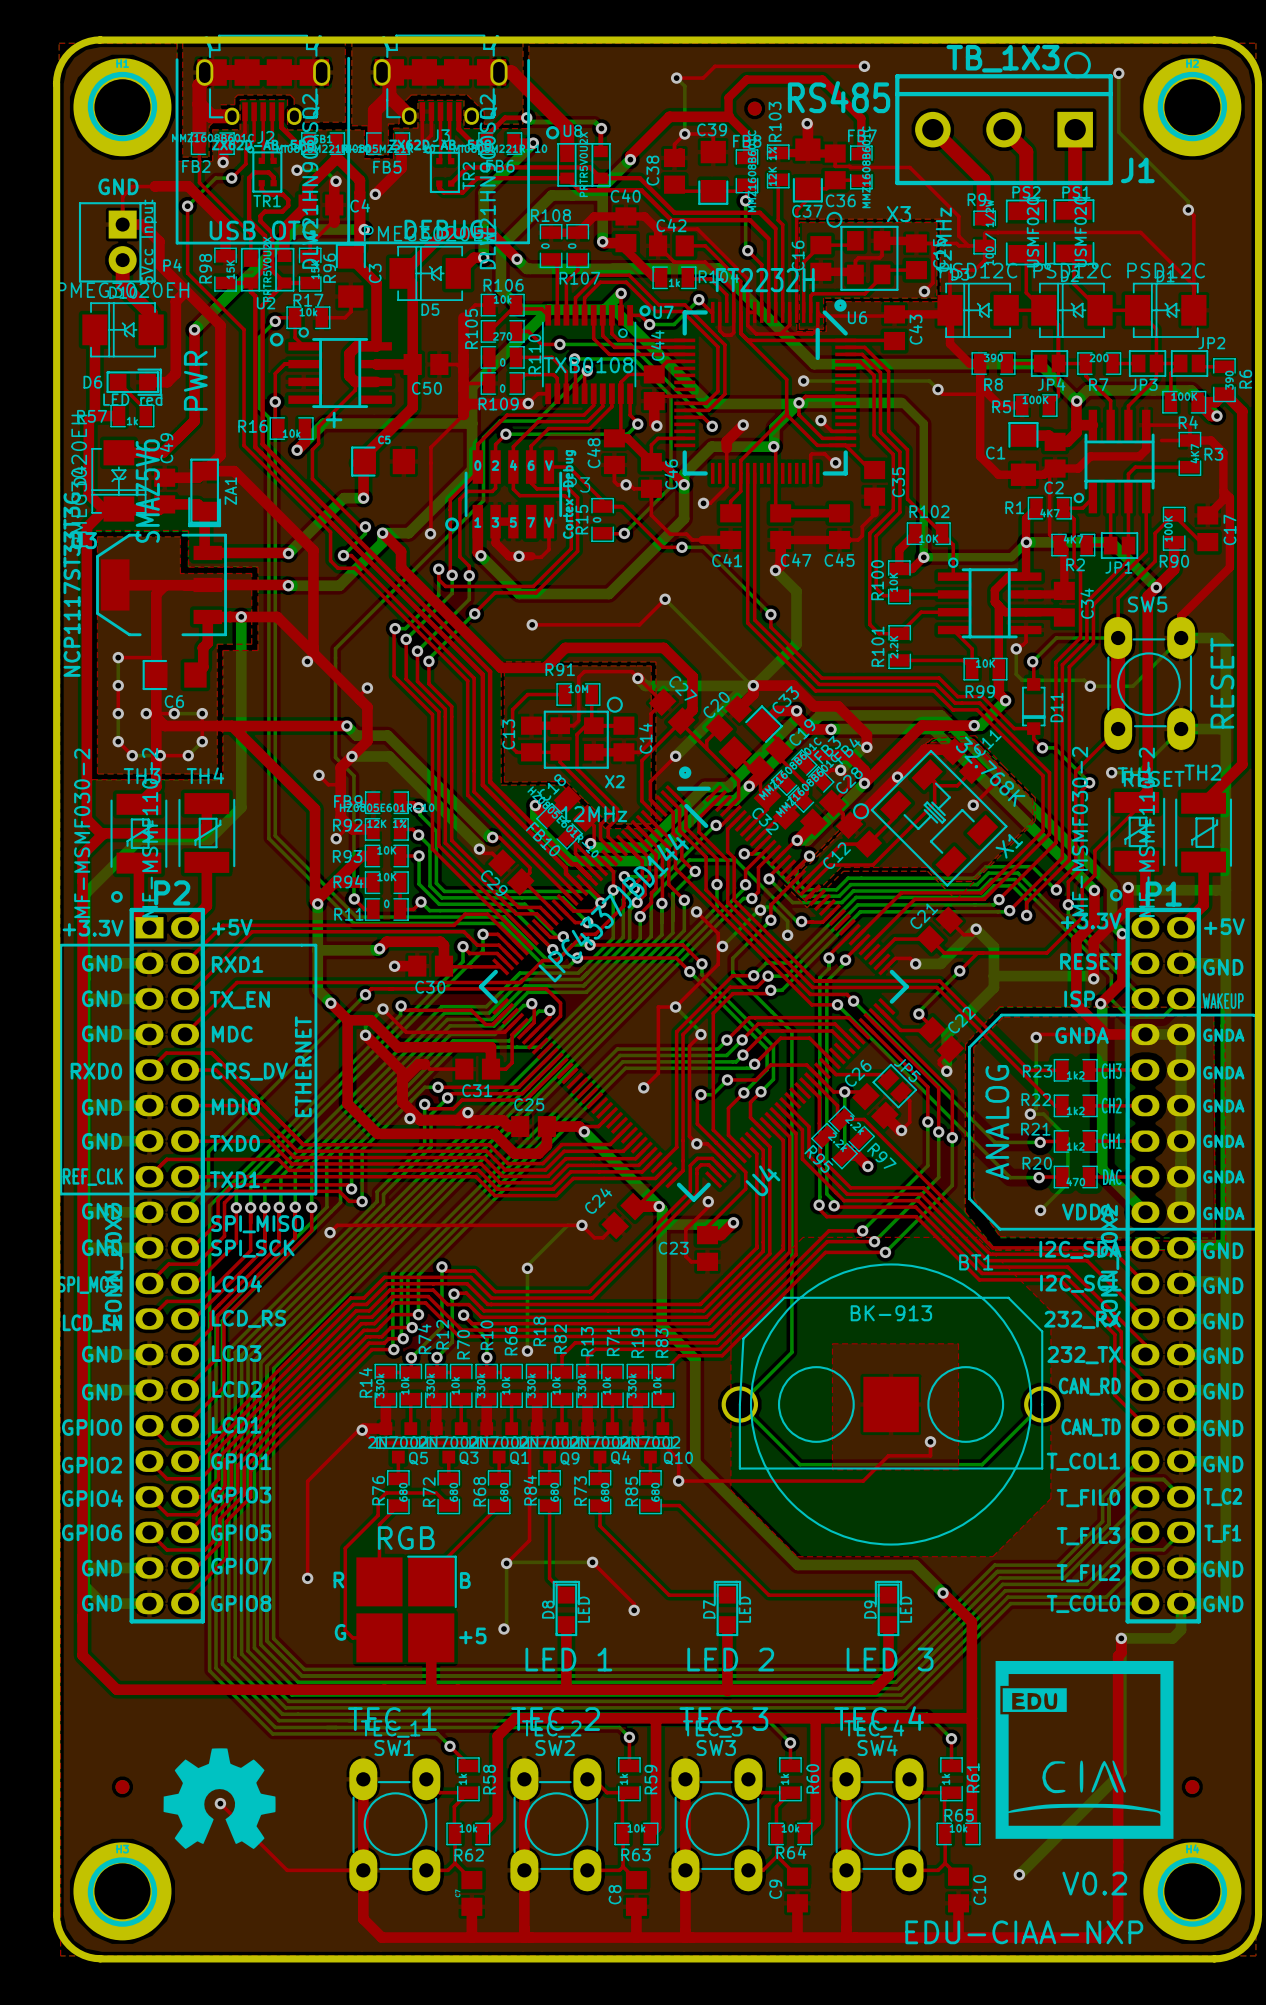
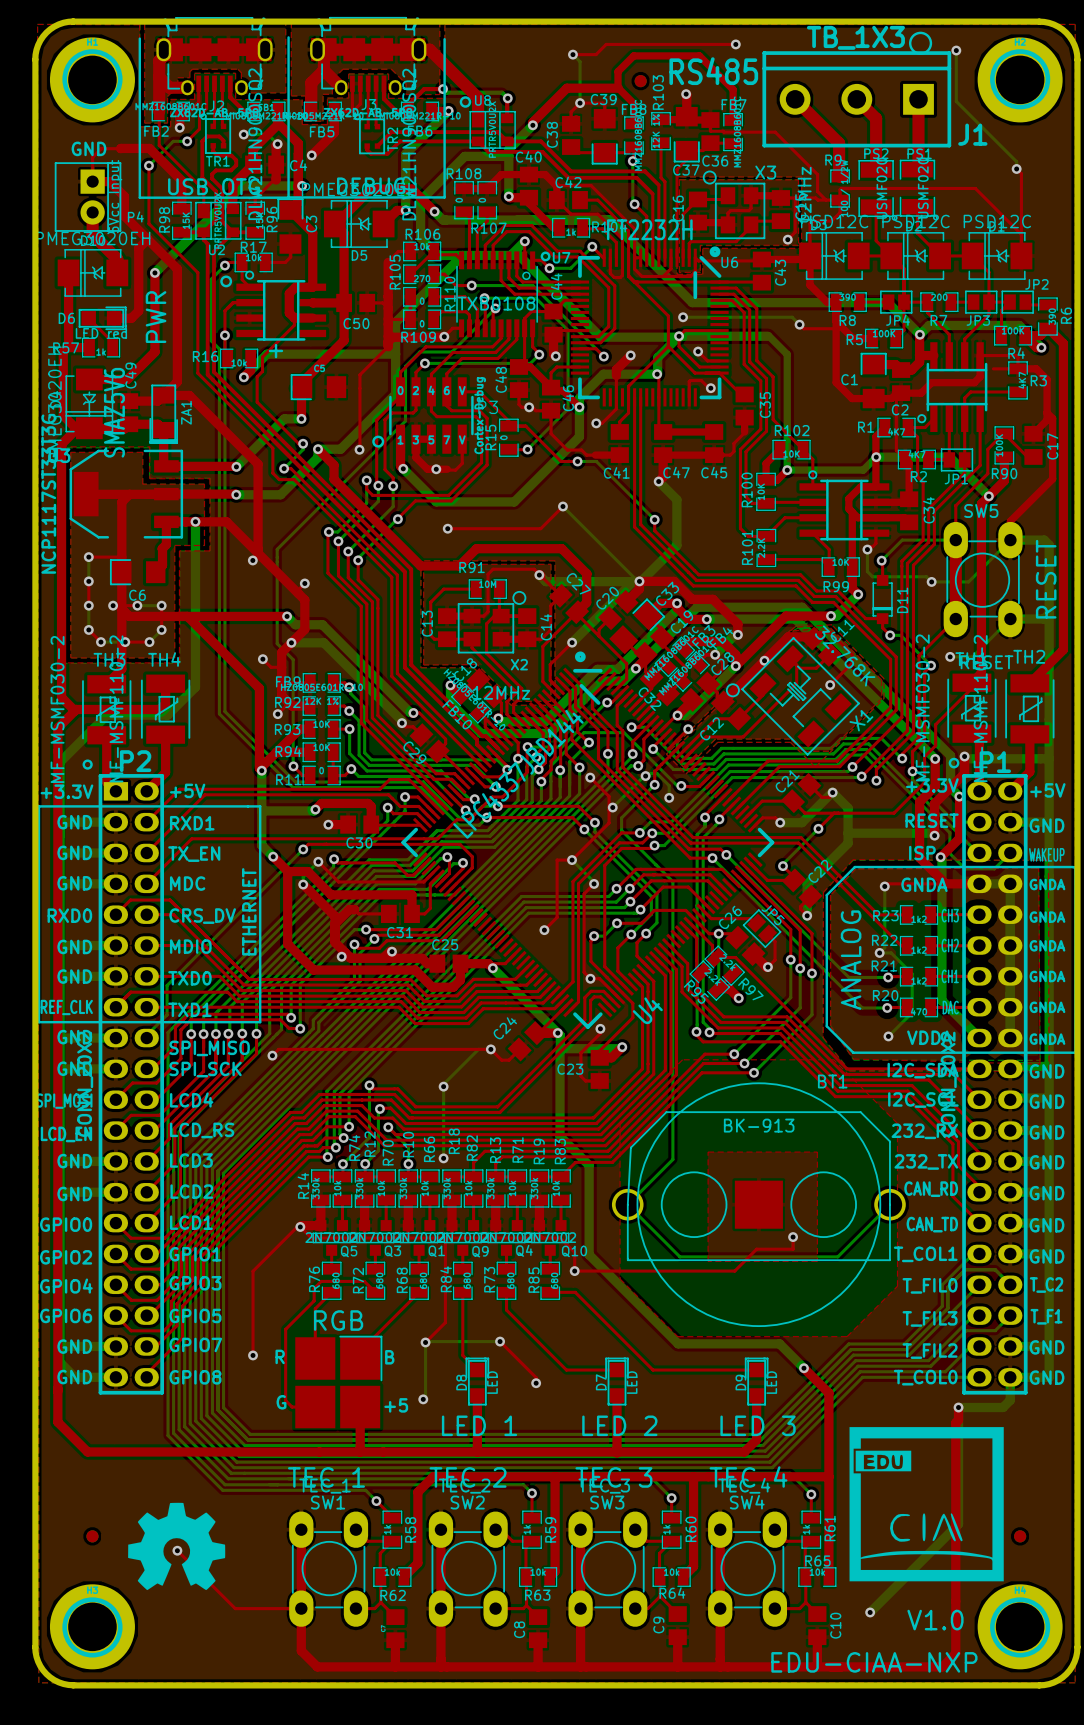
text: V0.2 (1094, 1883) -> V1.0 (935, 1620)

